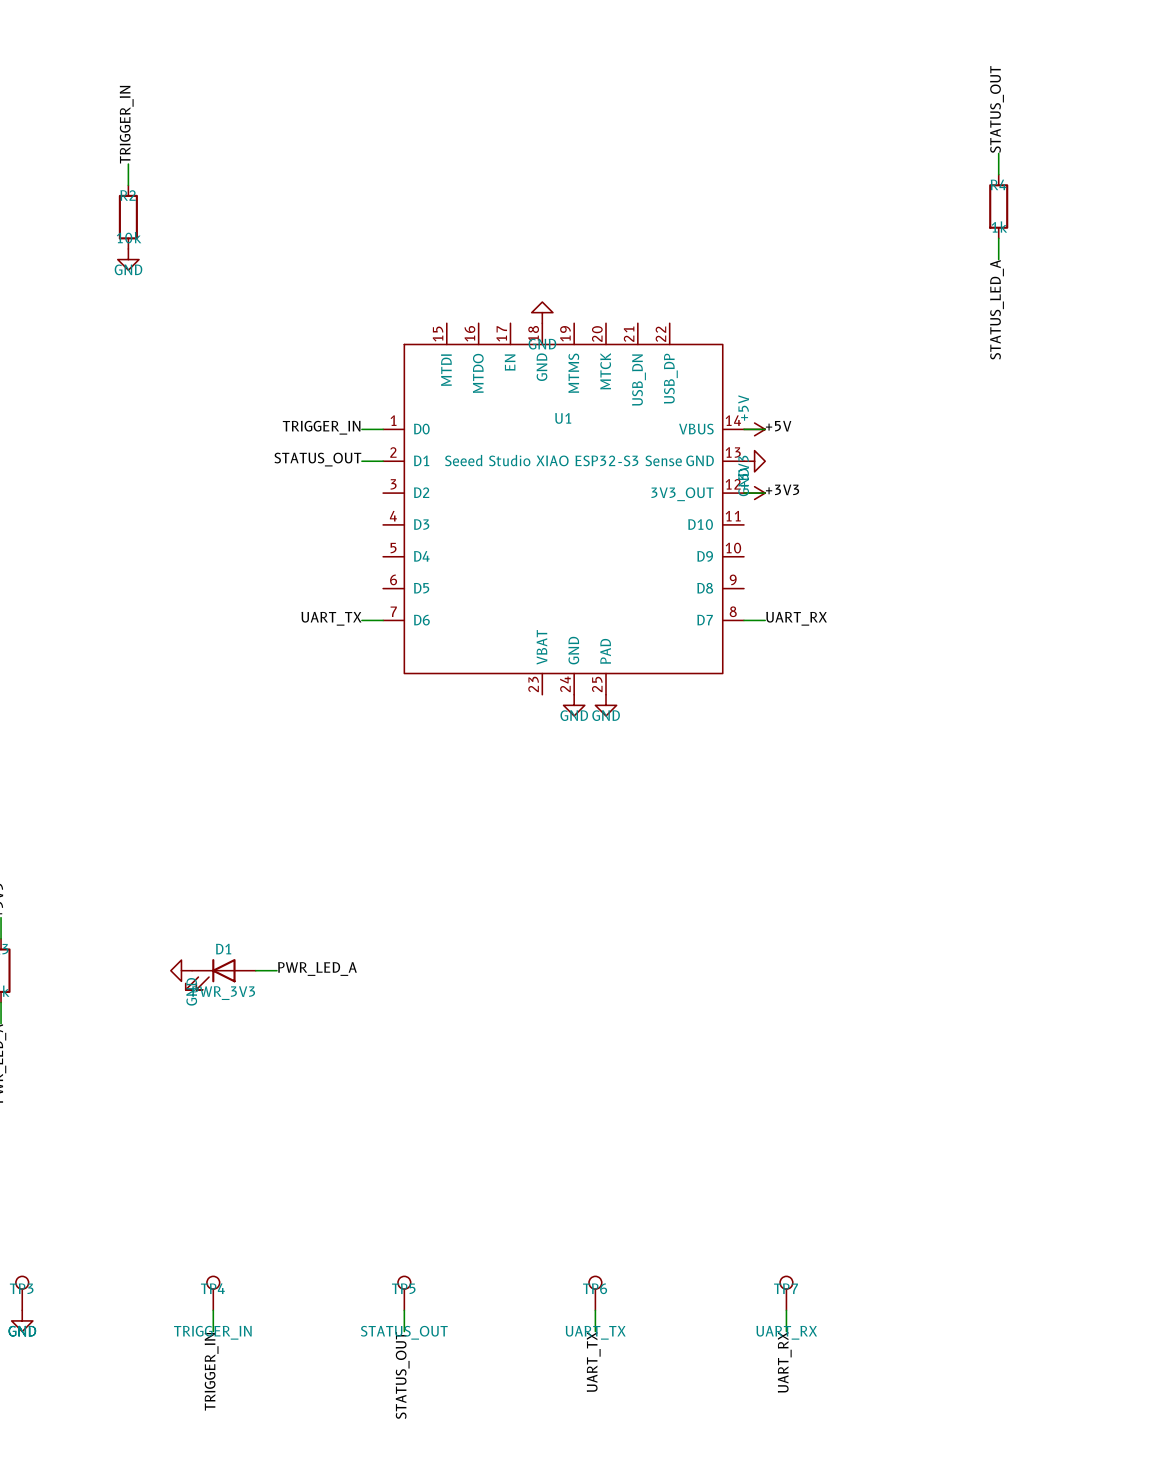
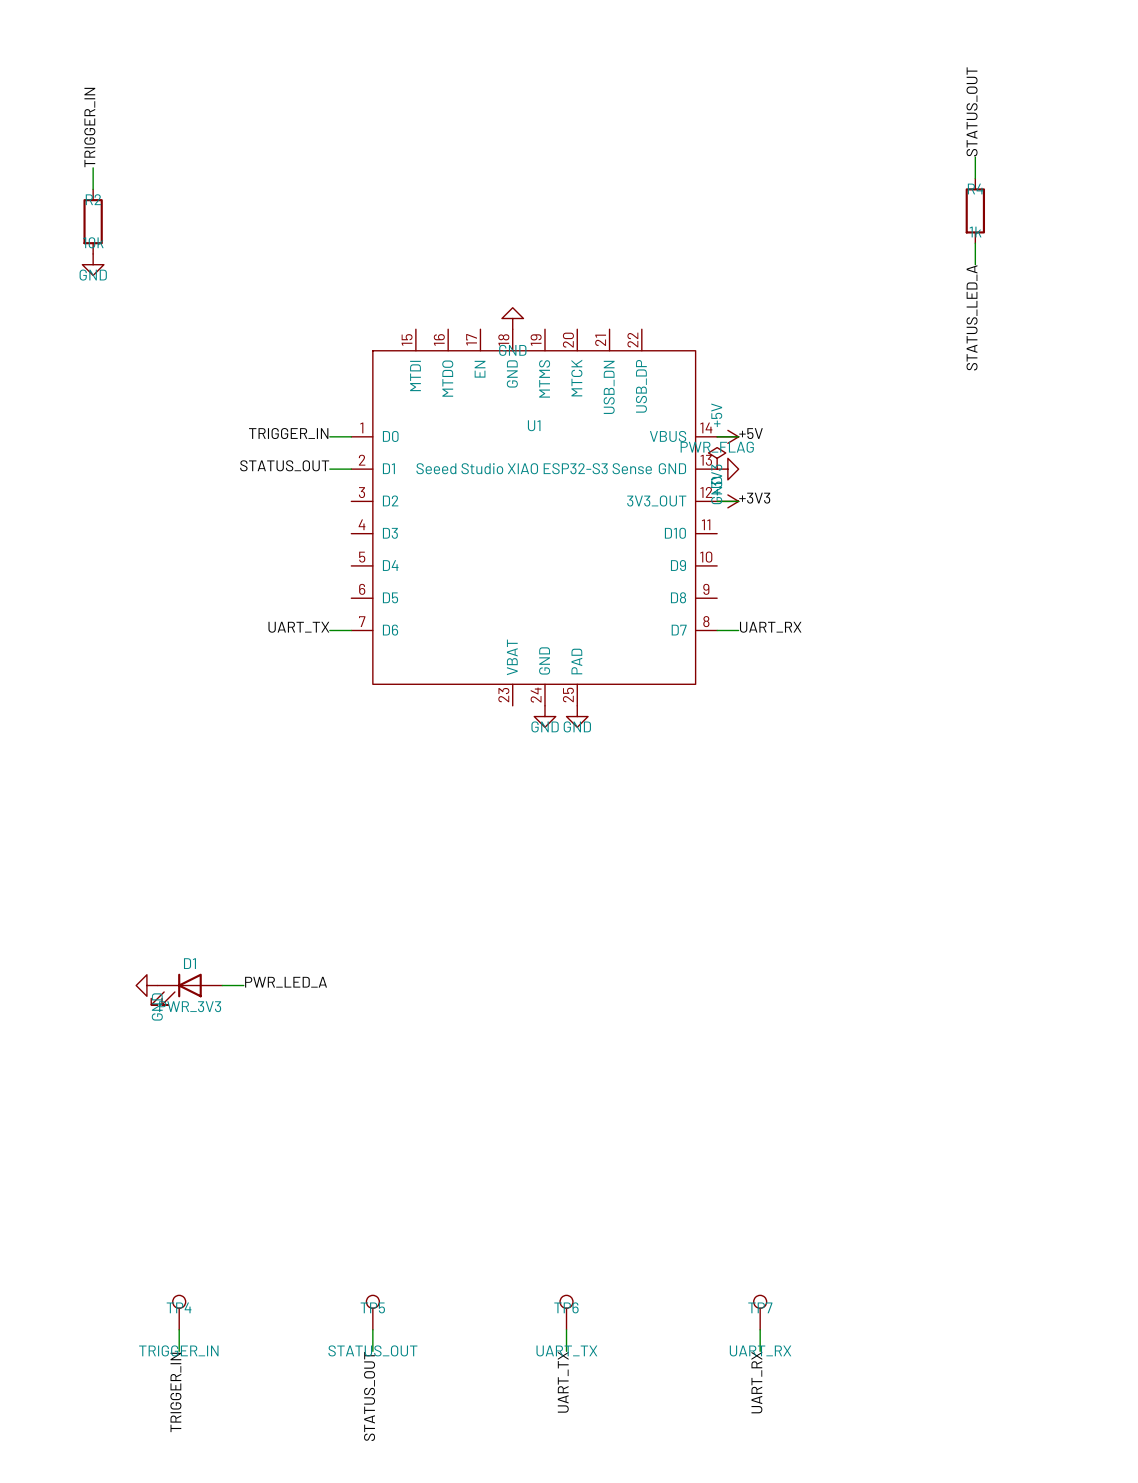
power symbol: none -> PWR_FLAG (717, 458)

